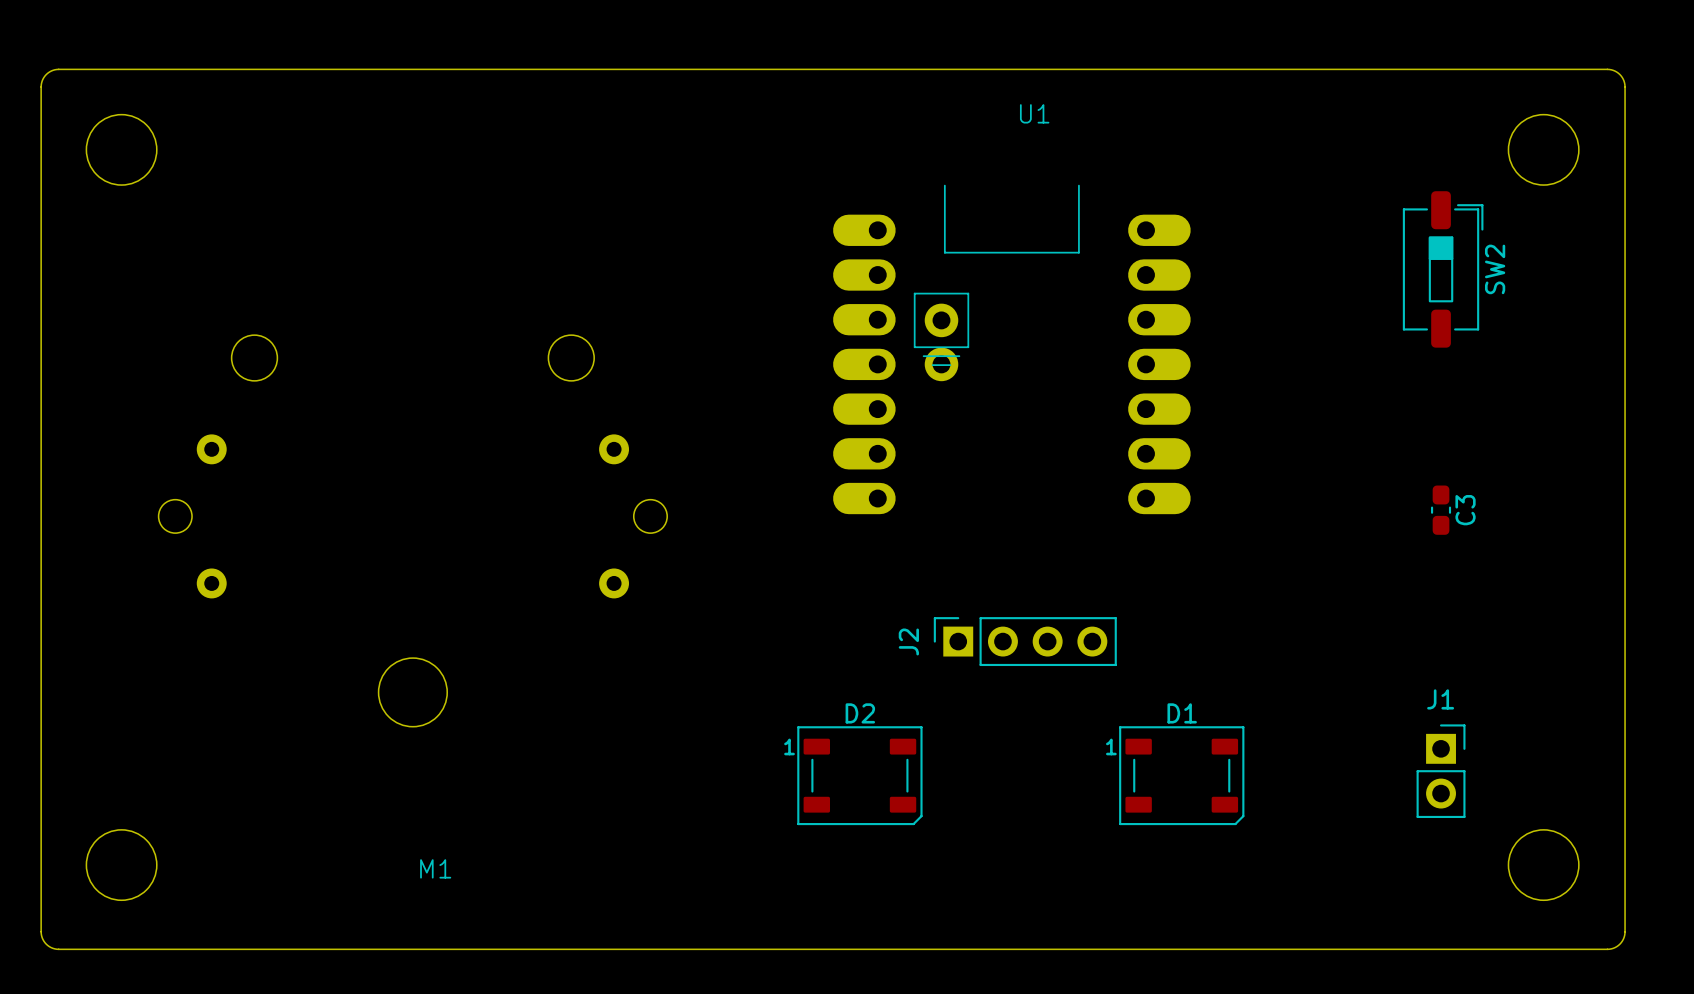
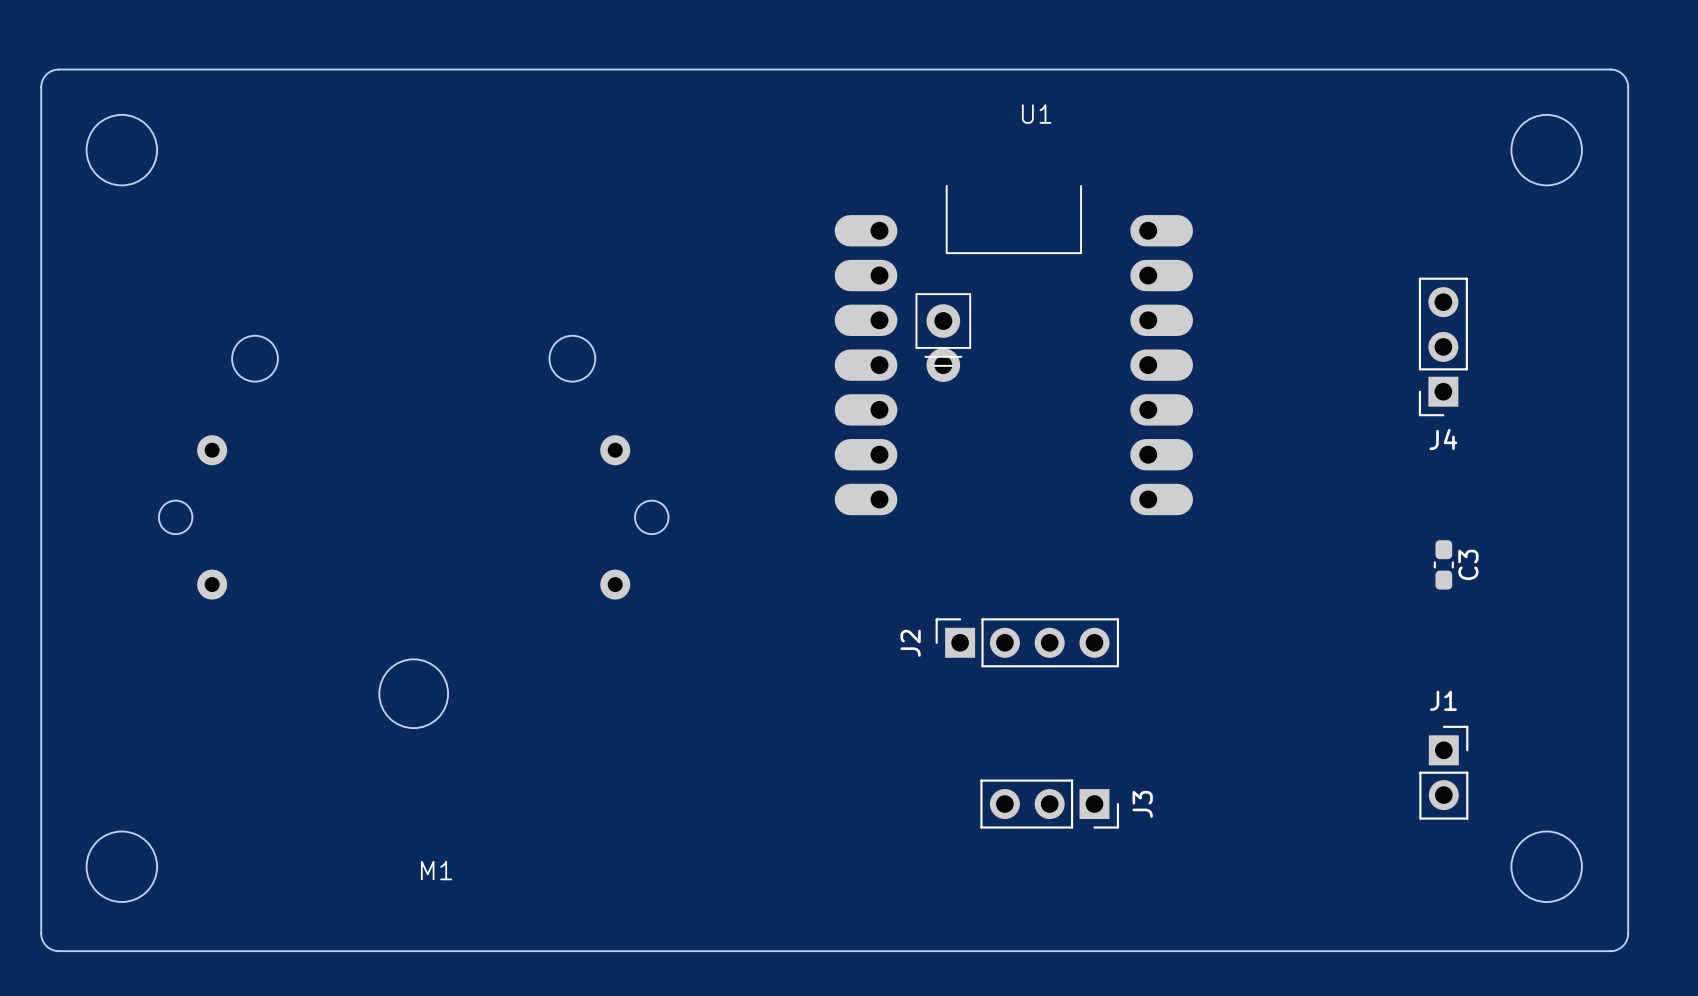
SW2: (1443, 269) -> none
J4: none -> (1443, 346)
C3 position: (1441, 510) -> (1443, 564)
D2: (859, 775) -> none
D1: (1181, 775) -> none
J3: none -> (1049, 804)

